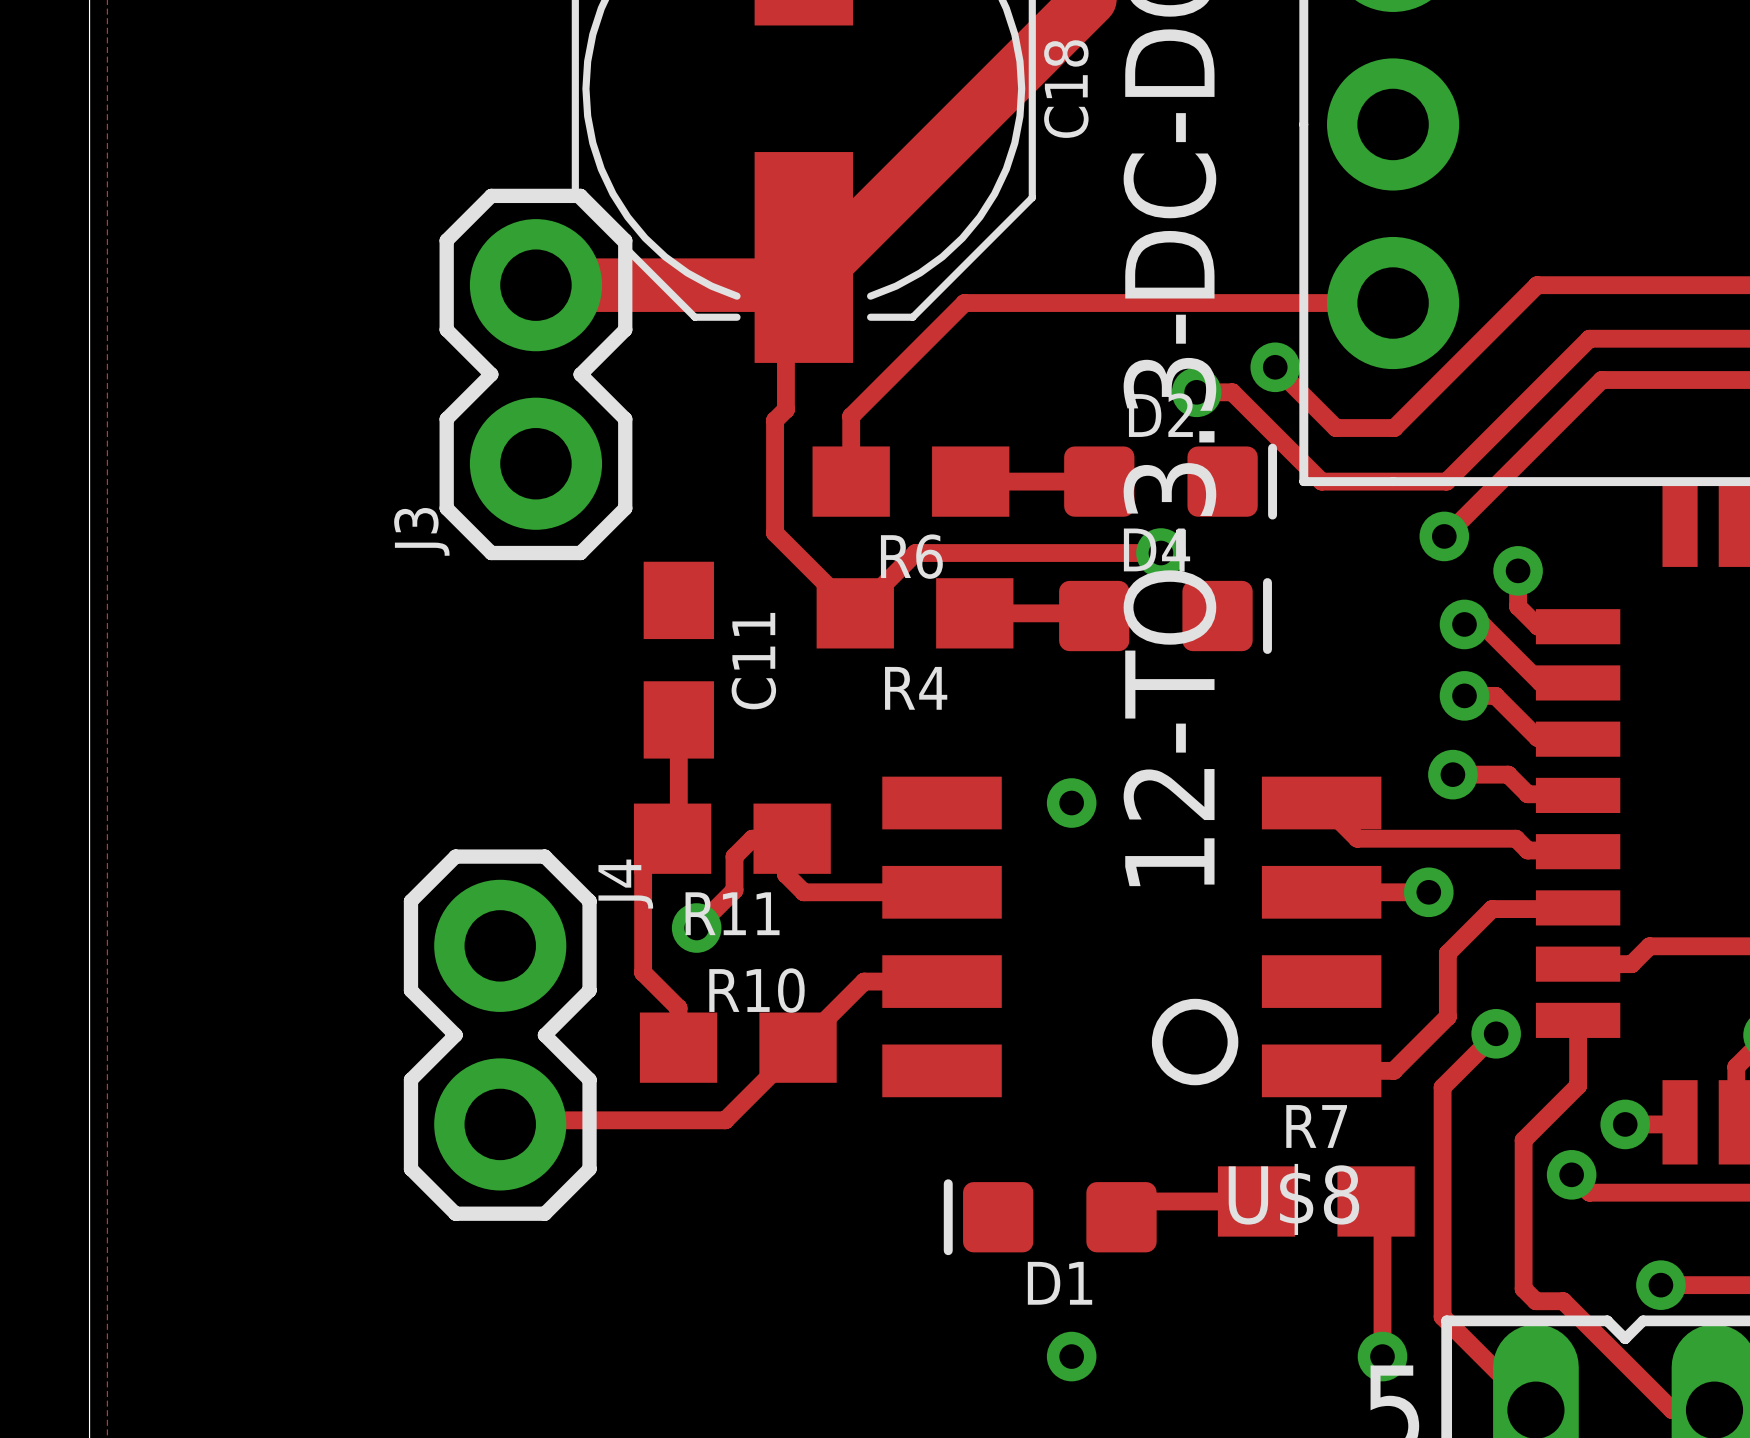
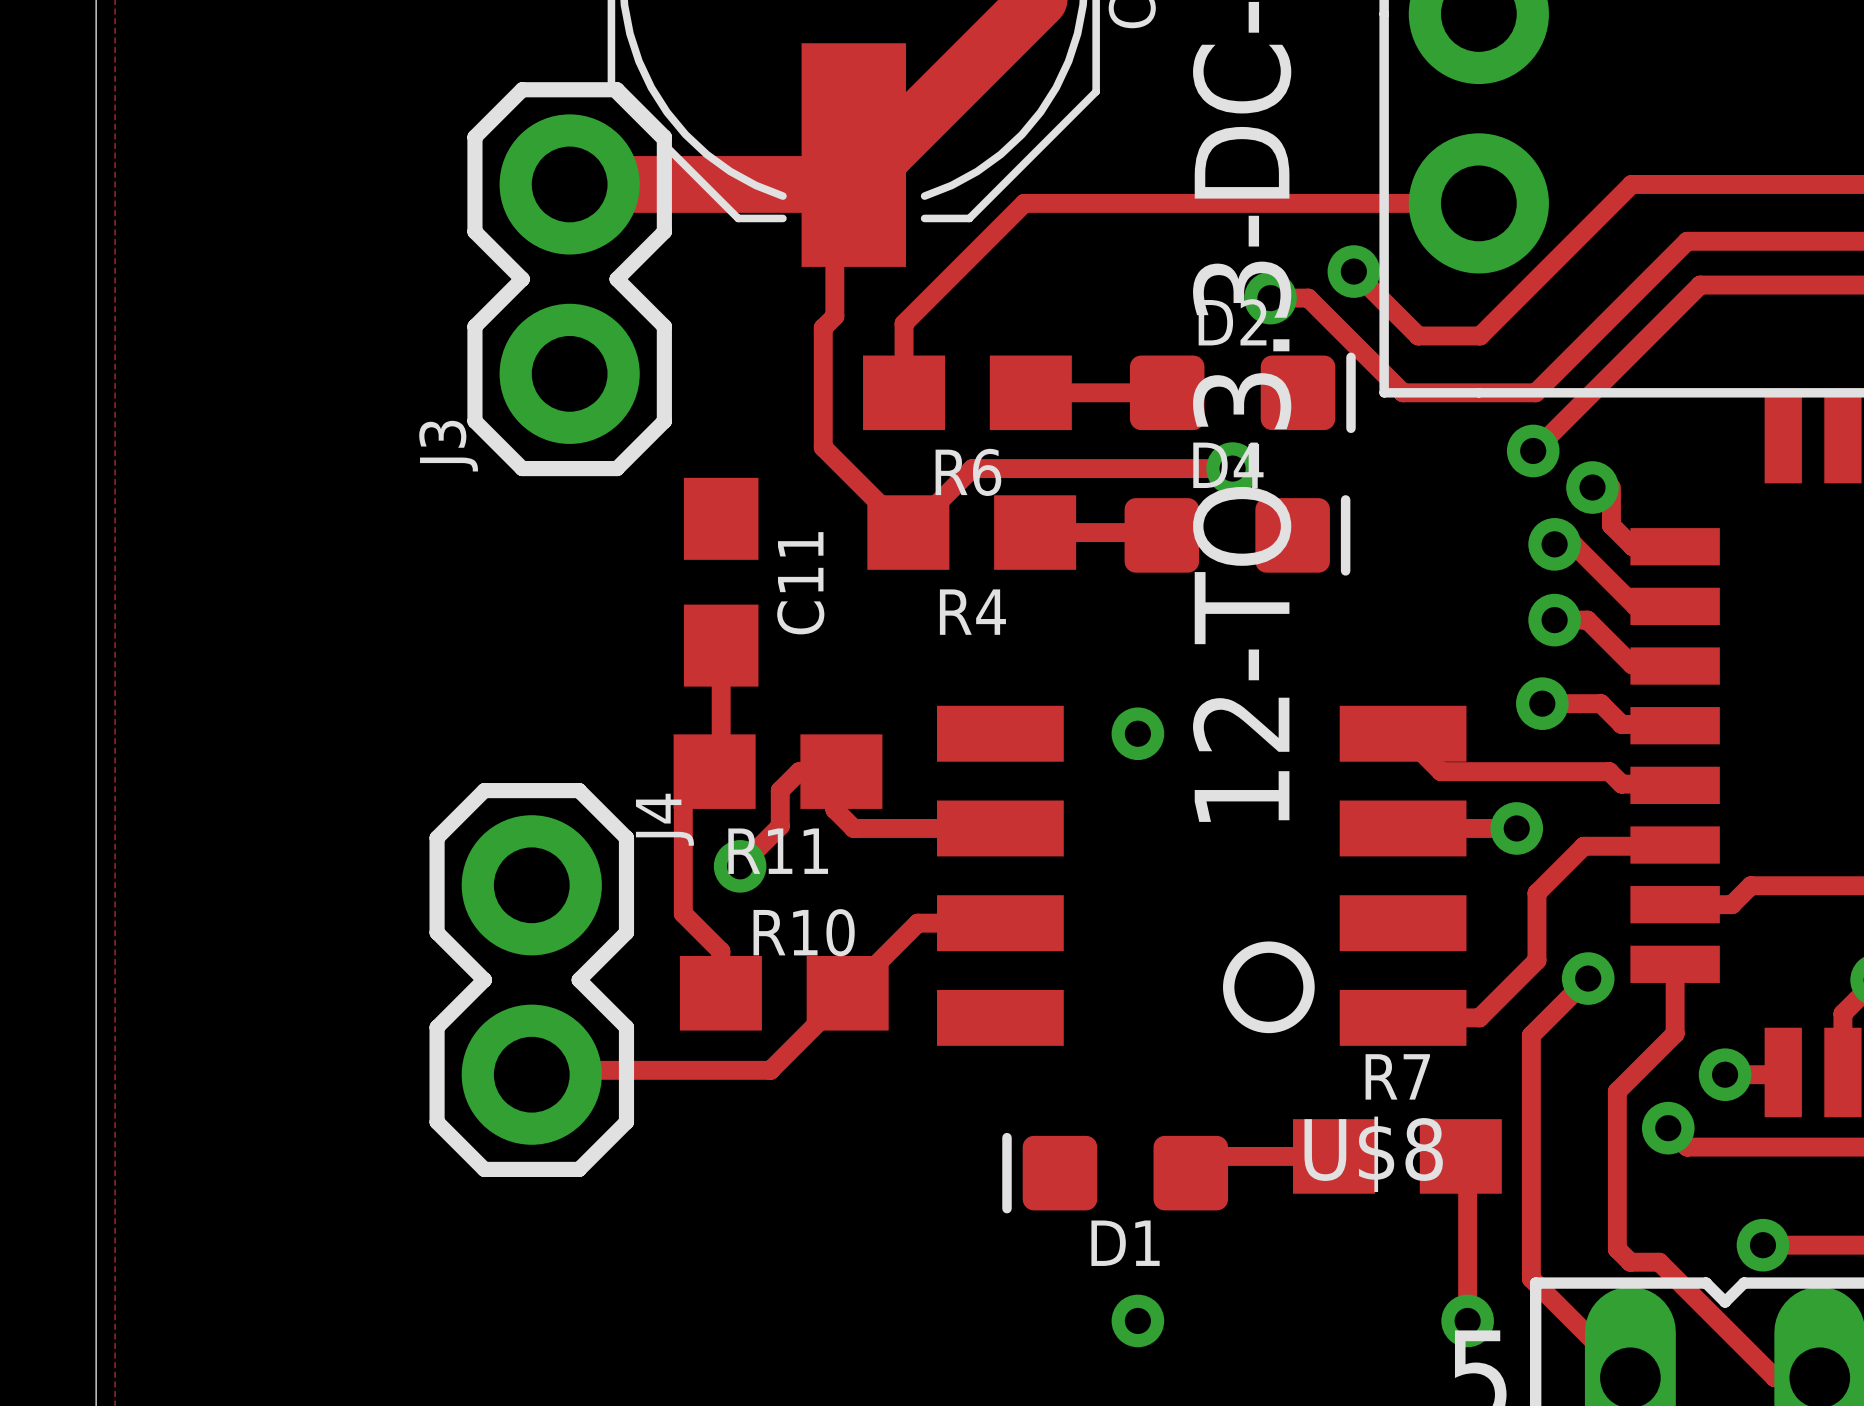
via position: (1518, 570) -> (1592, 487)

